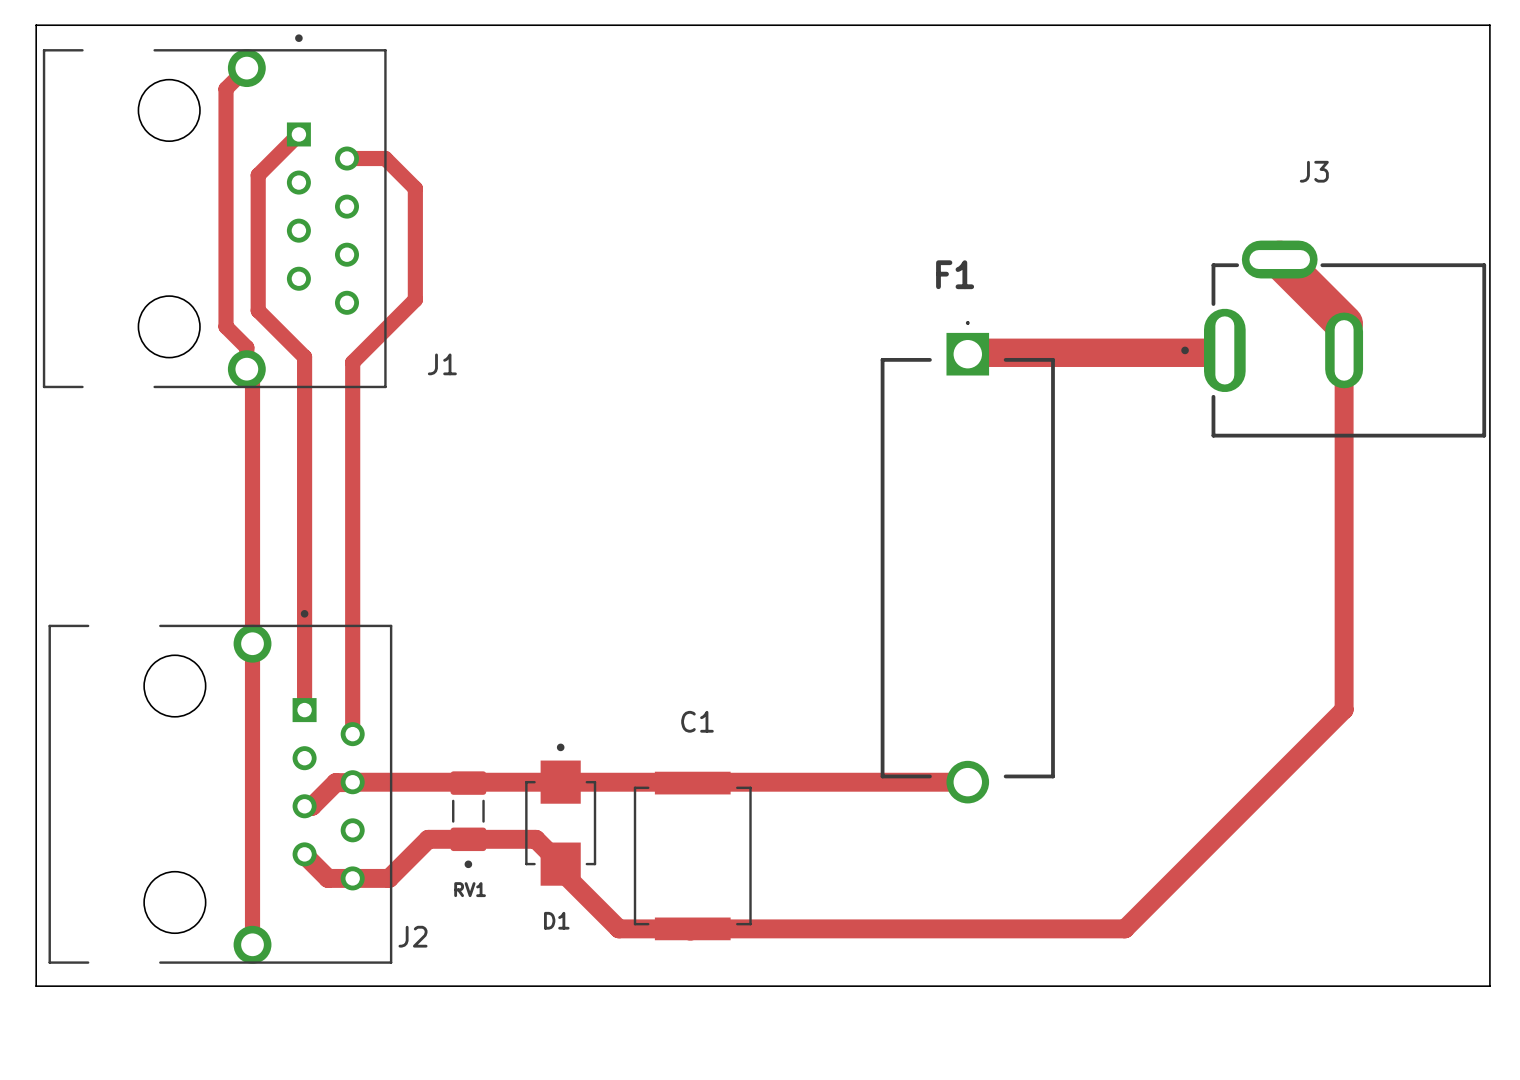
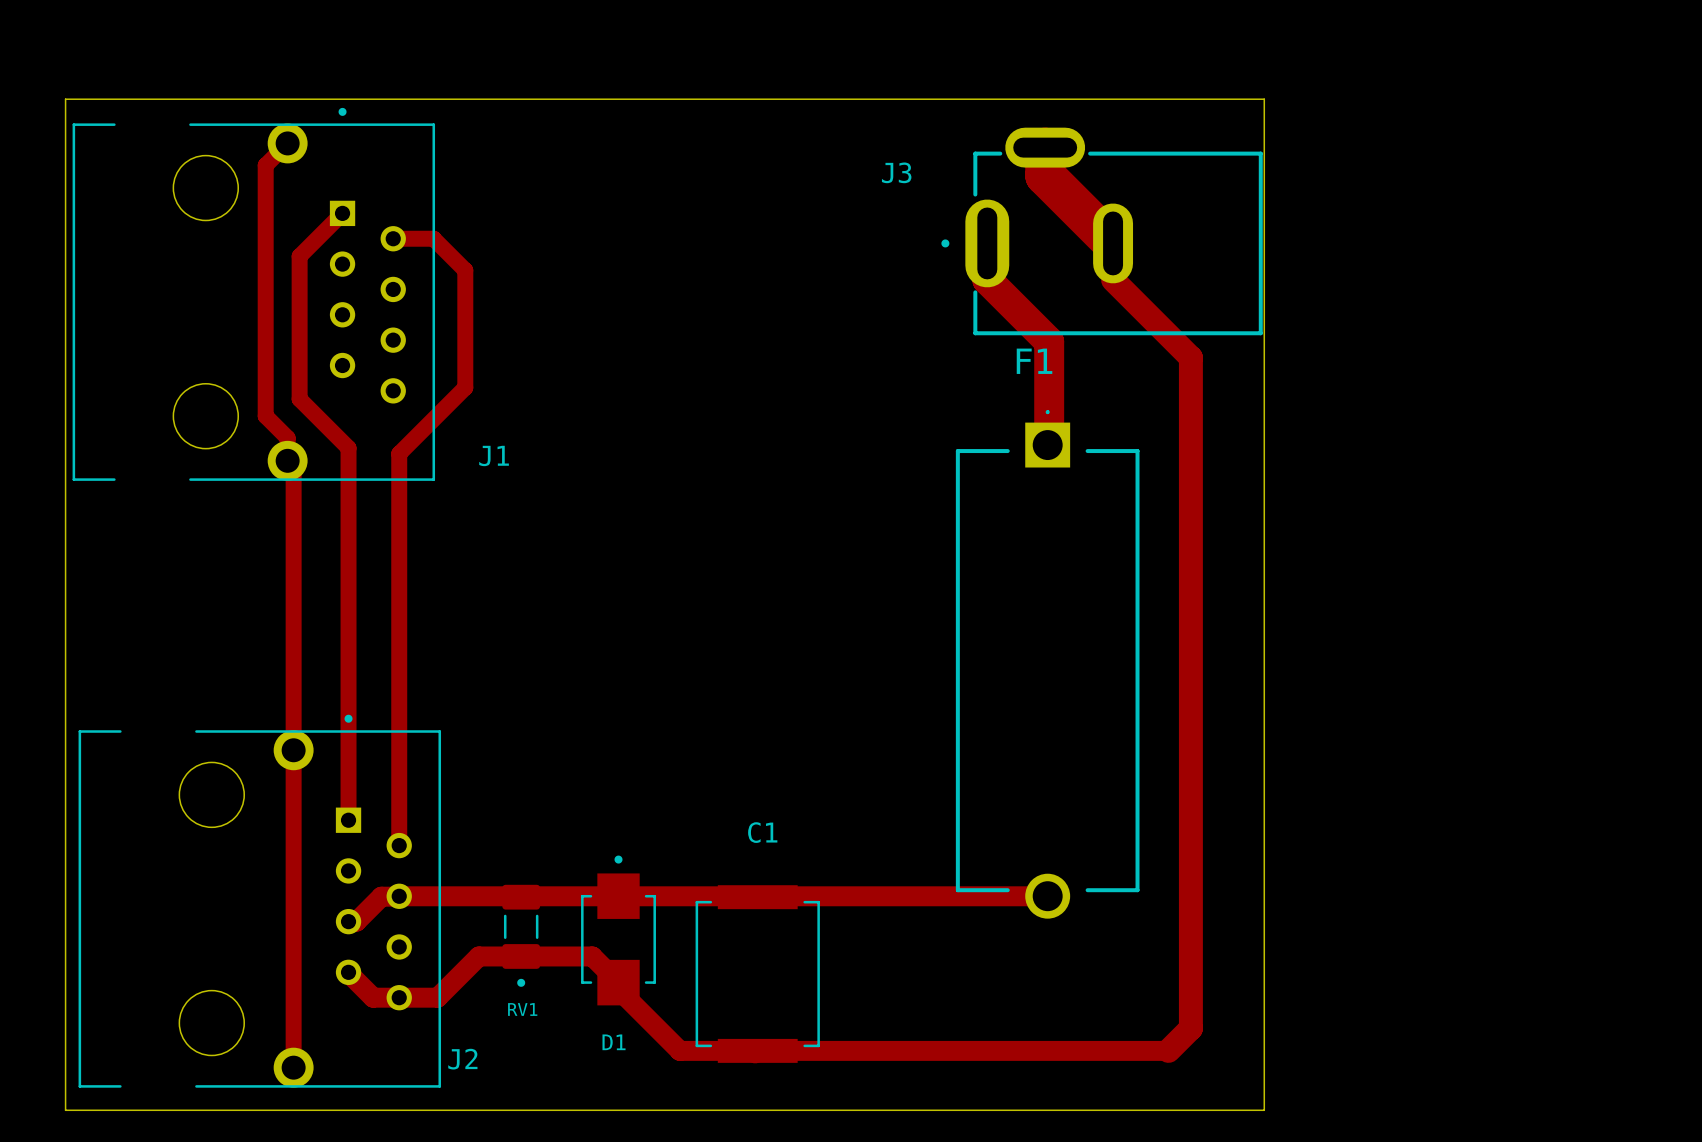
board edge: (36, 26) (1489, 25) (1489, 986) (36, 985) -> (65, 99) (1264, 99) (1264, 1110) (65, 1110)
track: none -> (1043, 149) (1045, 147) (1045, 175) (1113, 243)
J3 name position: J3 (1314, 171) -> J3 (896, 172)
track: (1279, 259) (1344, 323) (1344, 709) (1124, 928) (1082, 928) -> (1113, 279) (1190, 357) (1190, 1028) (1168, 1050)
J3 position: (1333, 339) -> (1102, 231)
track: (969, 352) (1222, 352) (1224, 350) (1223, 358) -> (1049, 443) (1049, 341) (987, 279) (987, 243)

